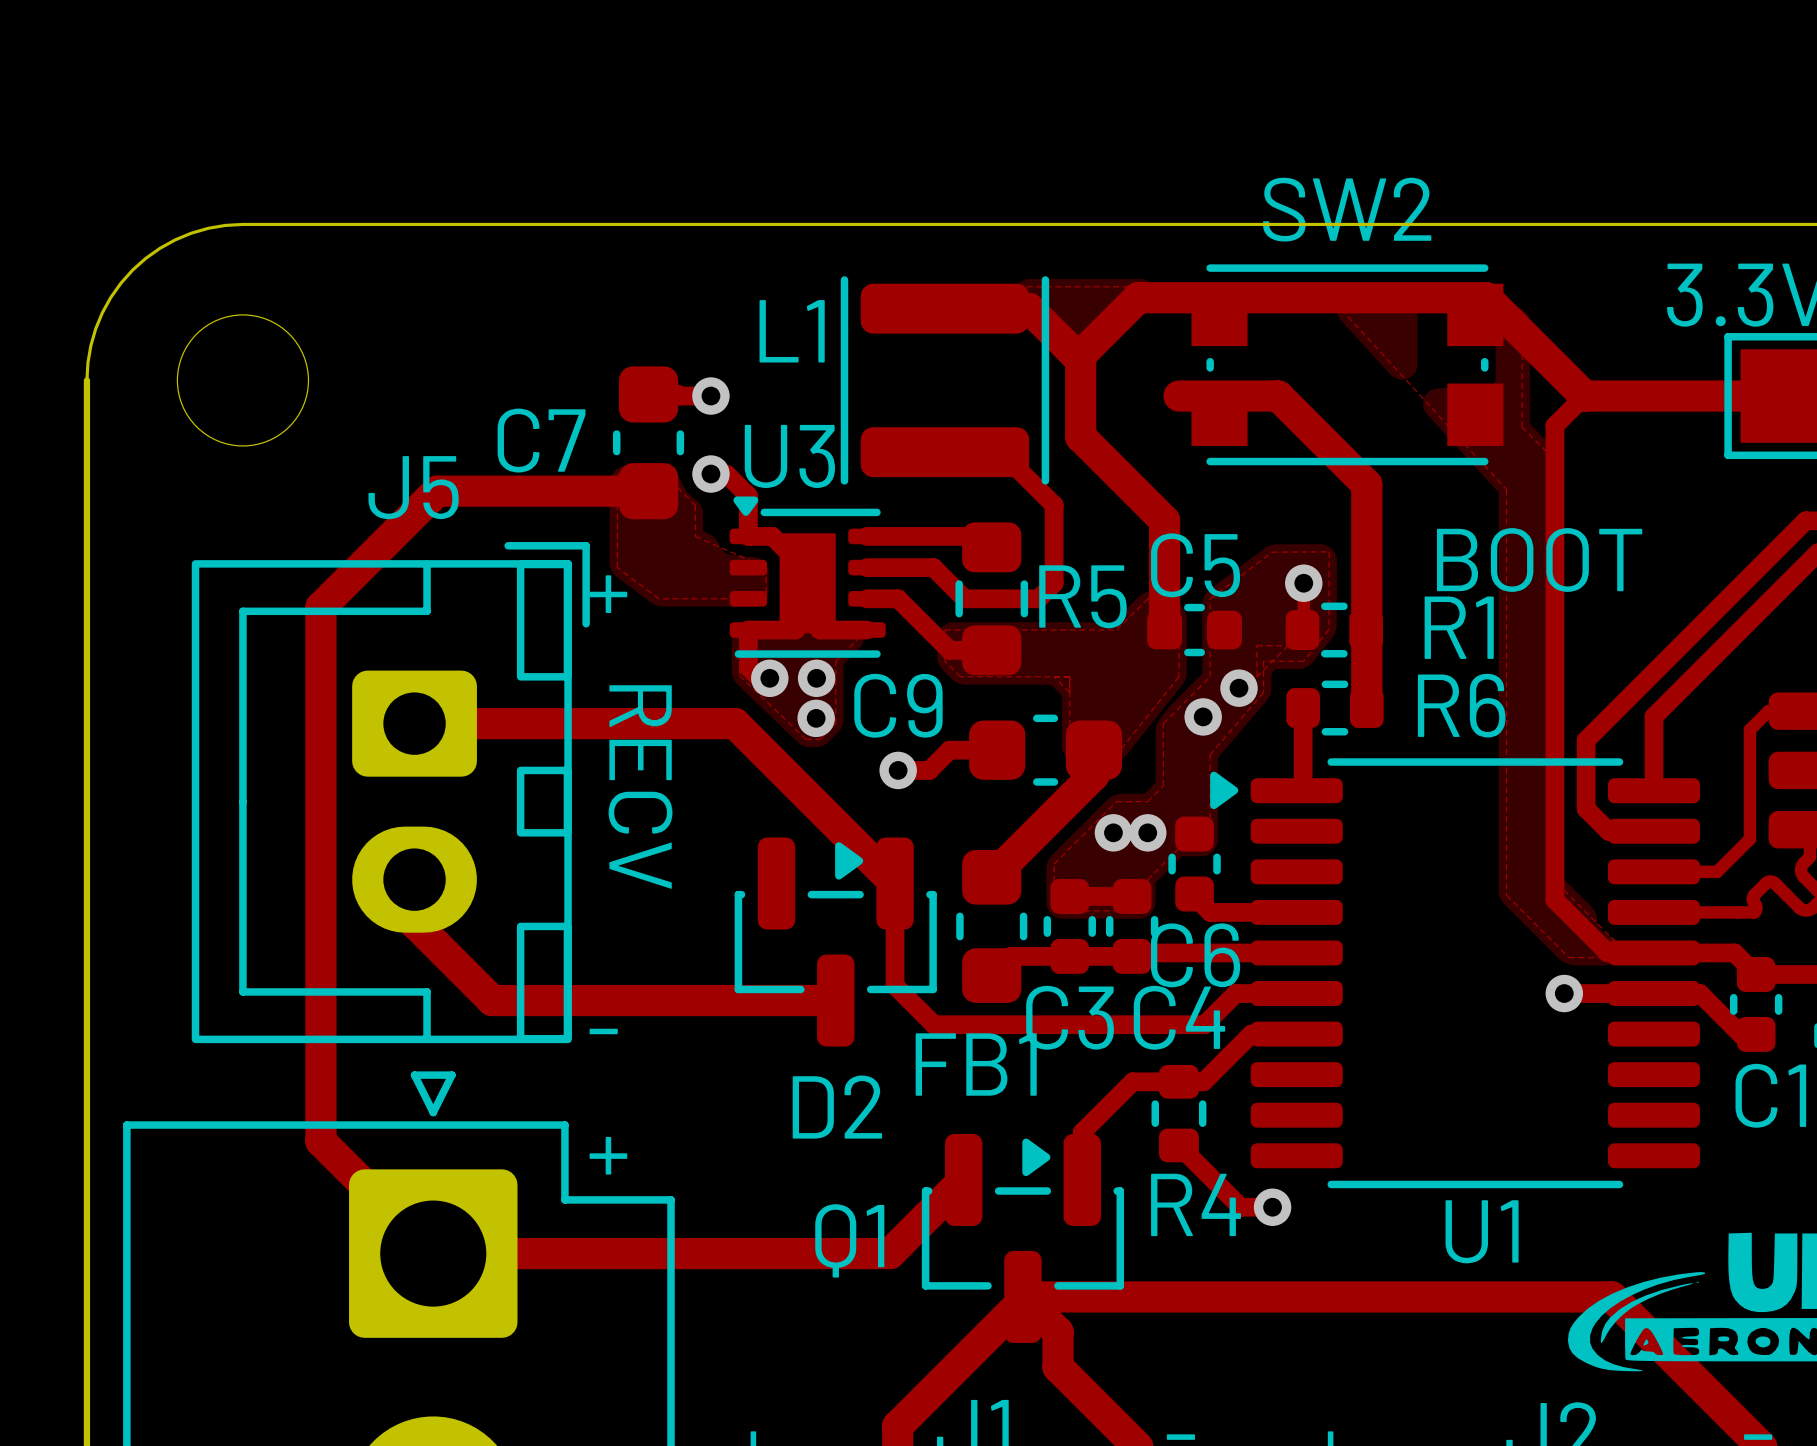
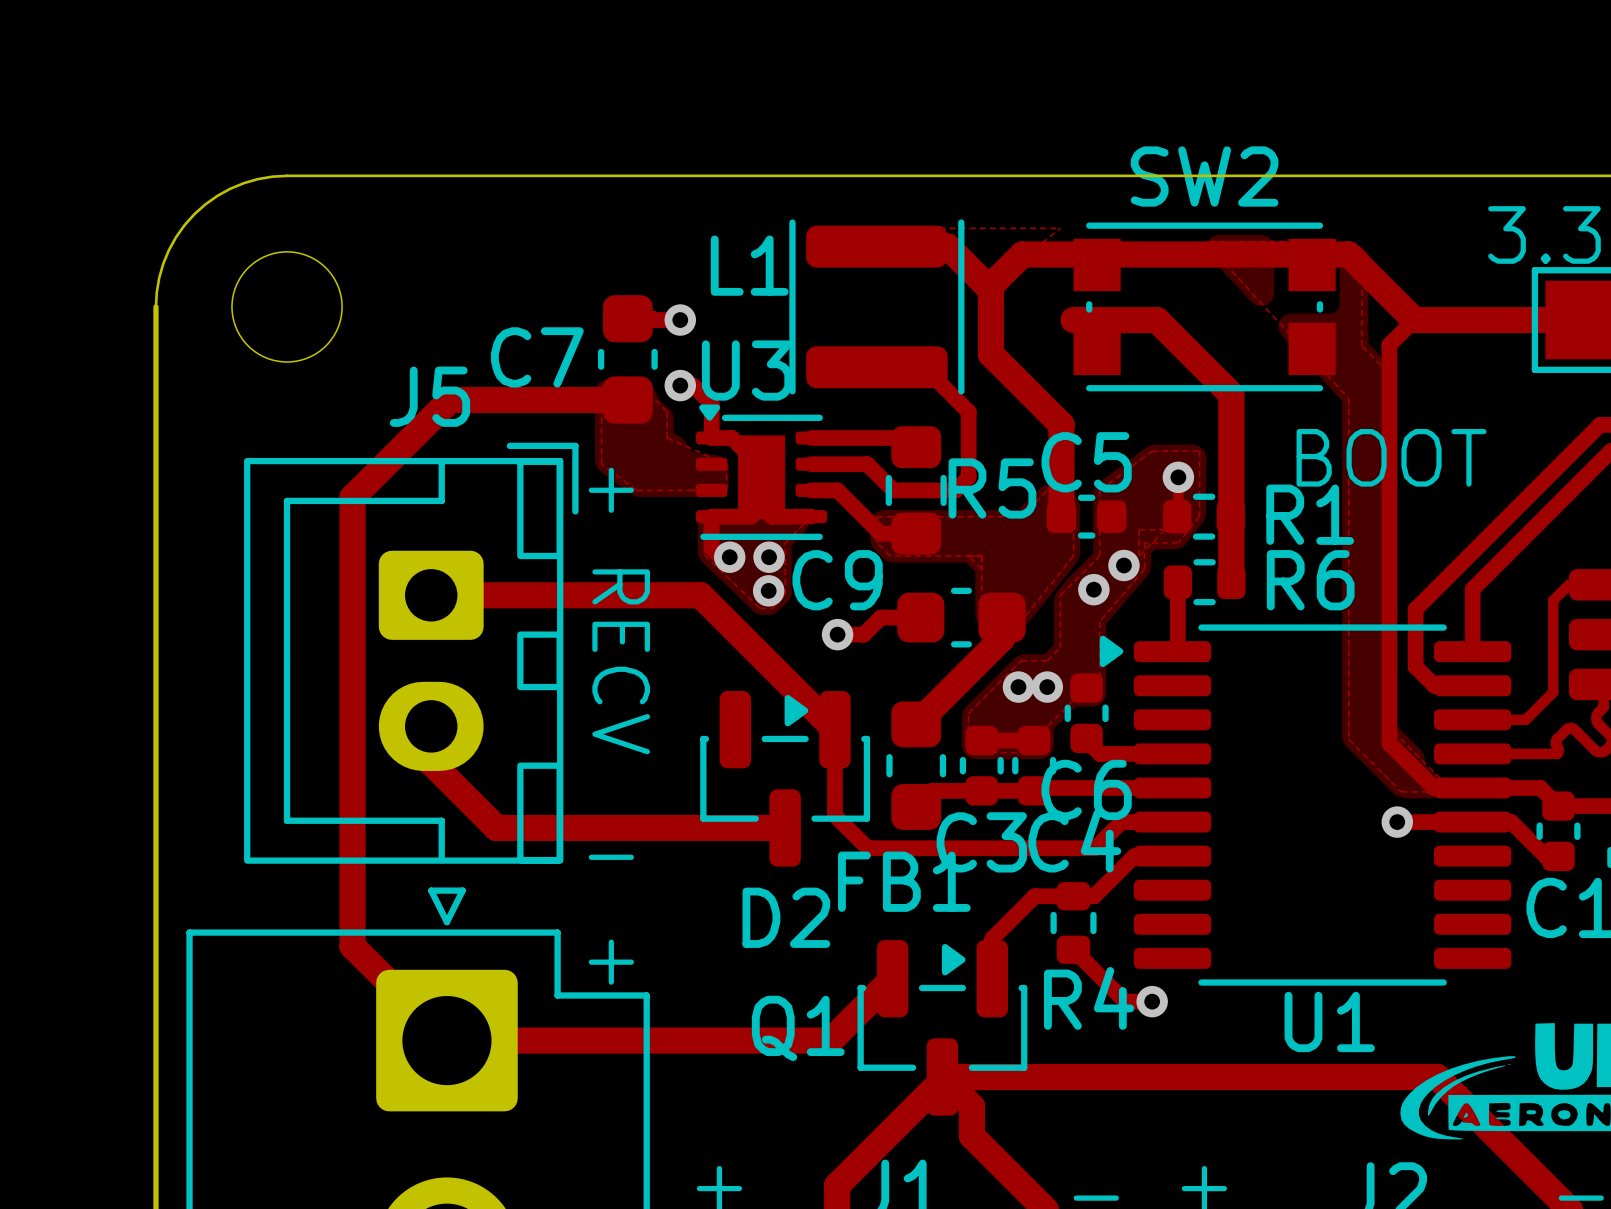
track: (1117, 318) (1138, 297) (1486, 297) (1506, 318) -> (1022, 254) (1348, 254)
SW2 position: (1347, 364) -> (1204, 306)

